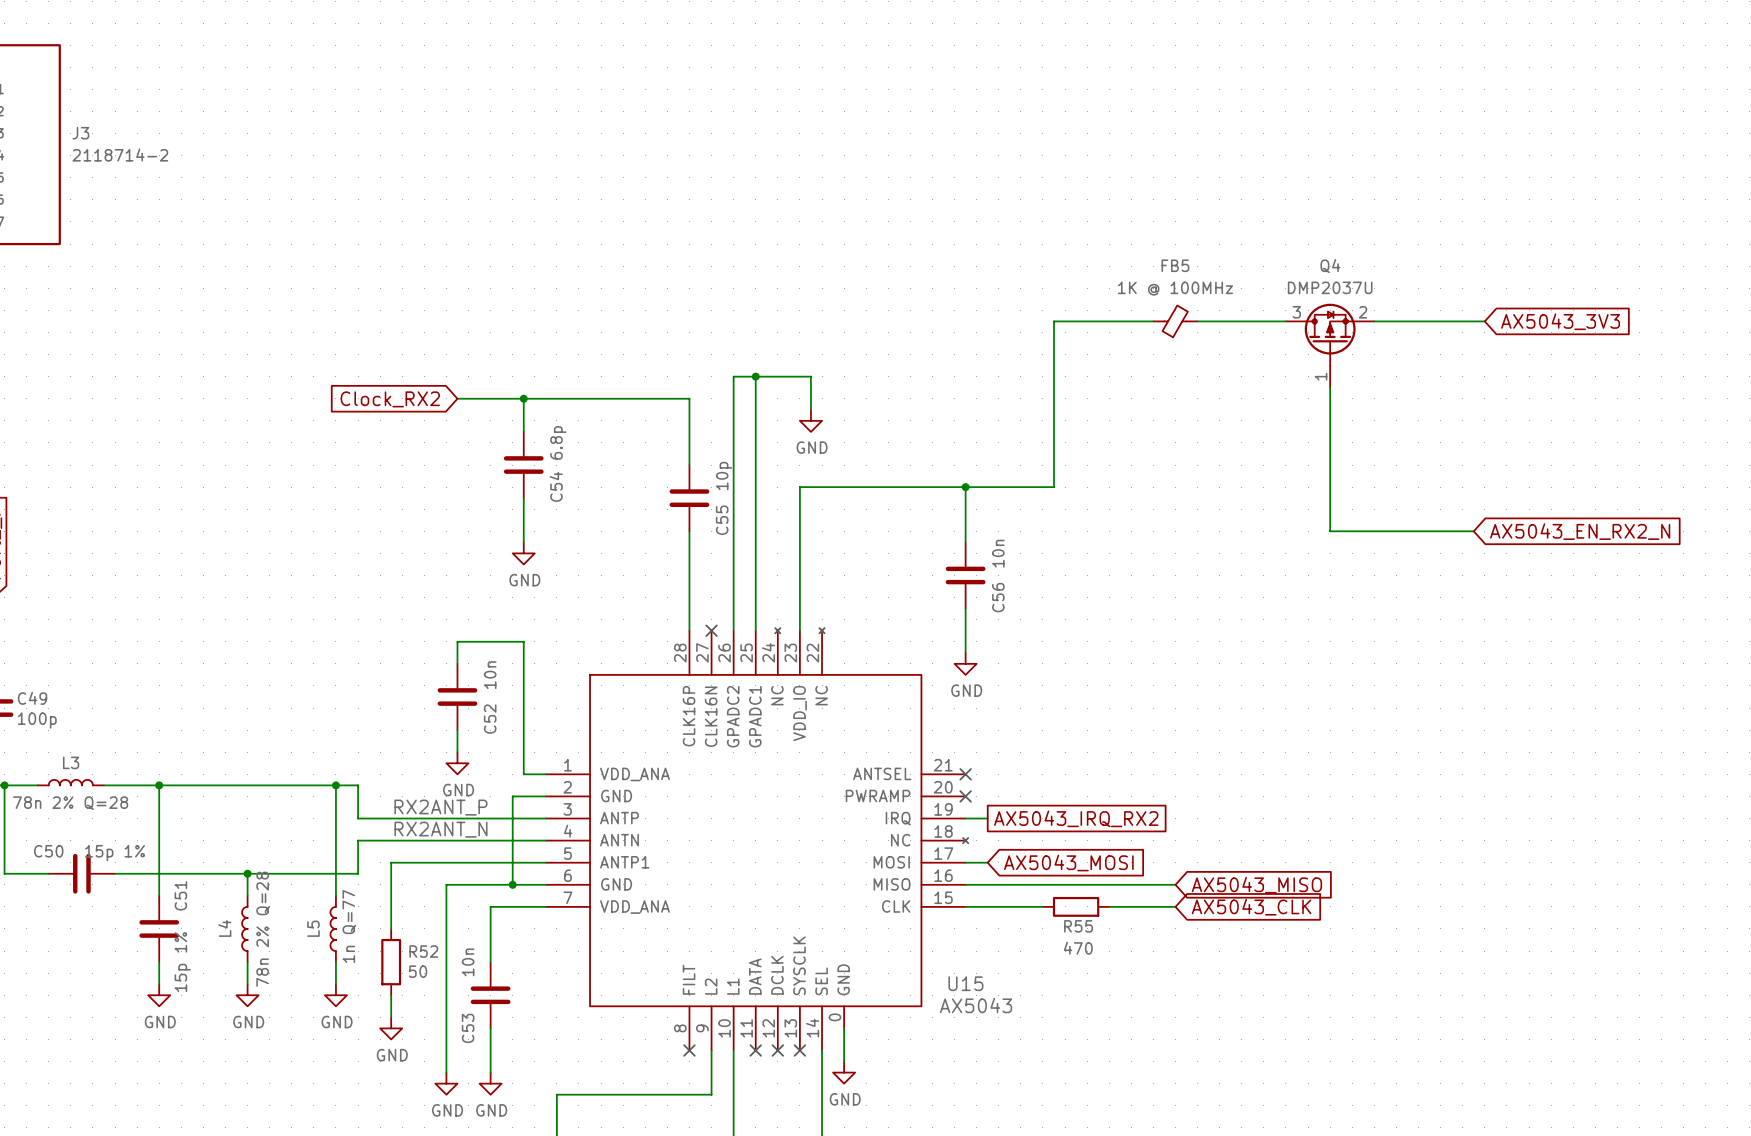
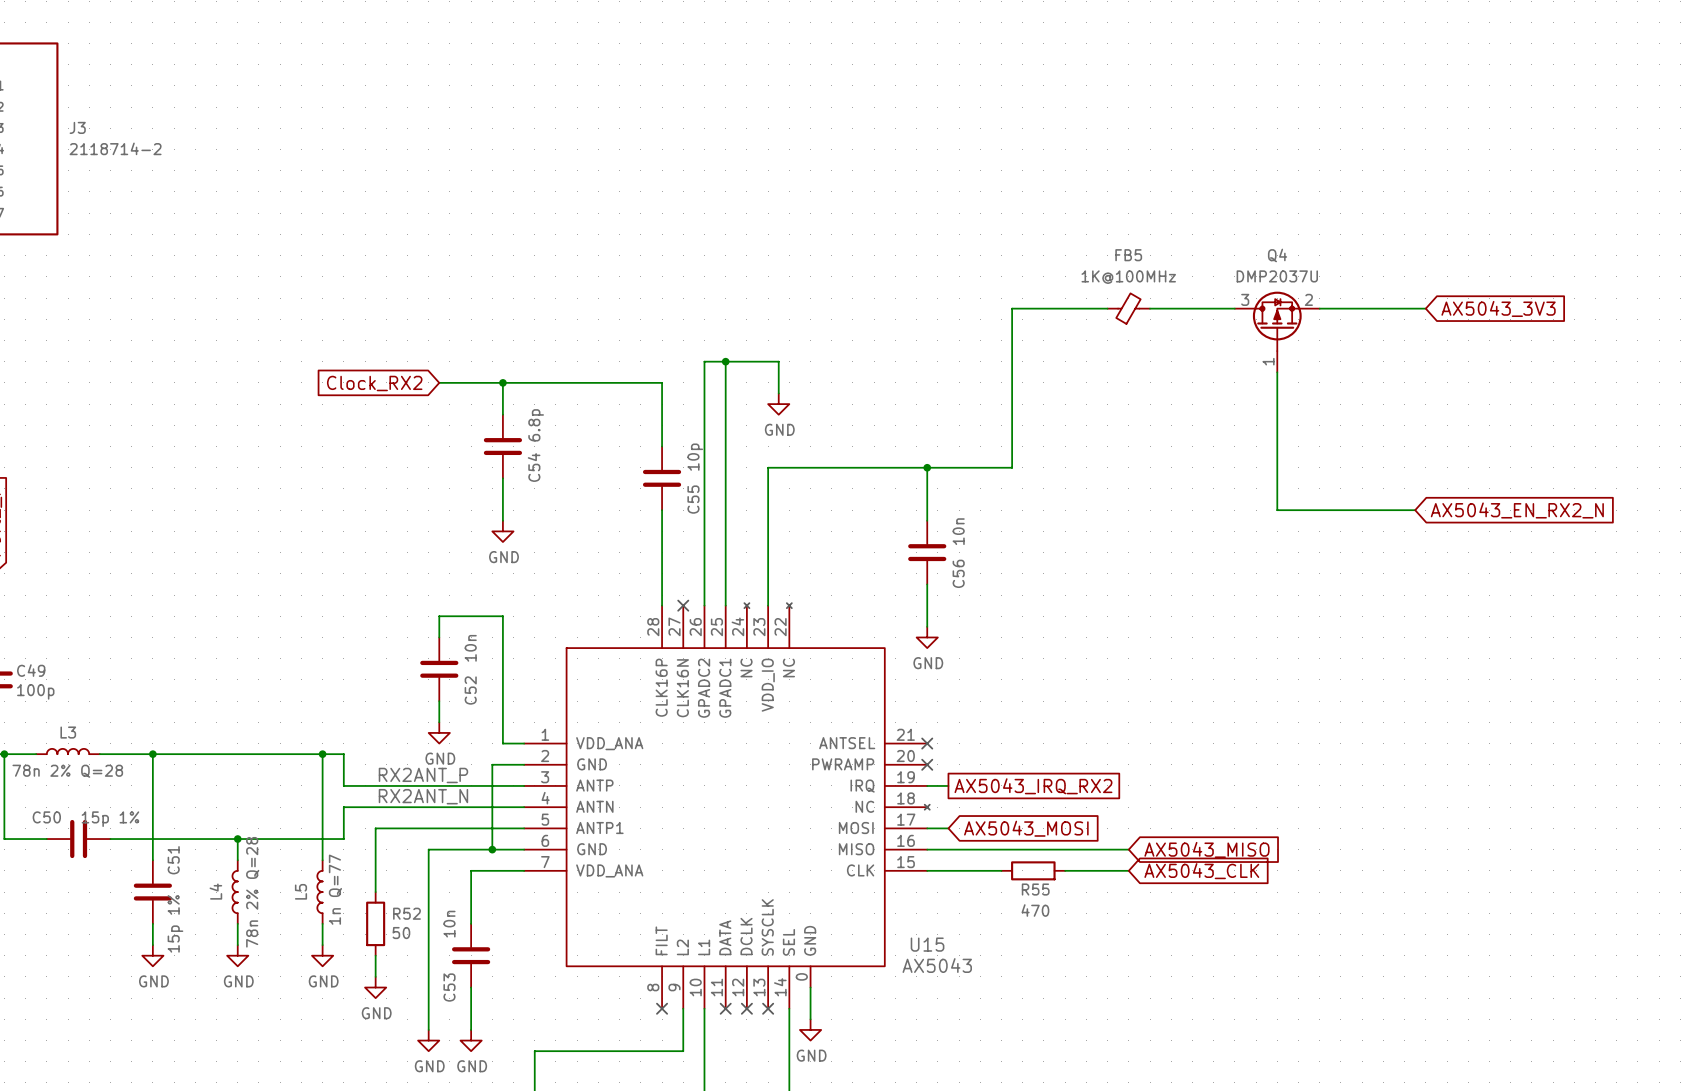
FB5 value: 1K @ 100MHz (1175, 288) -> 1K@100MHz (1128, 277)

